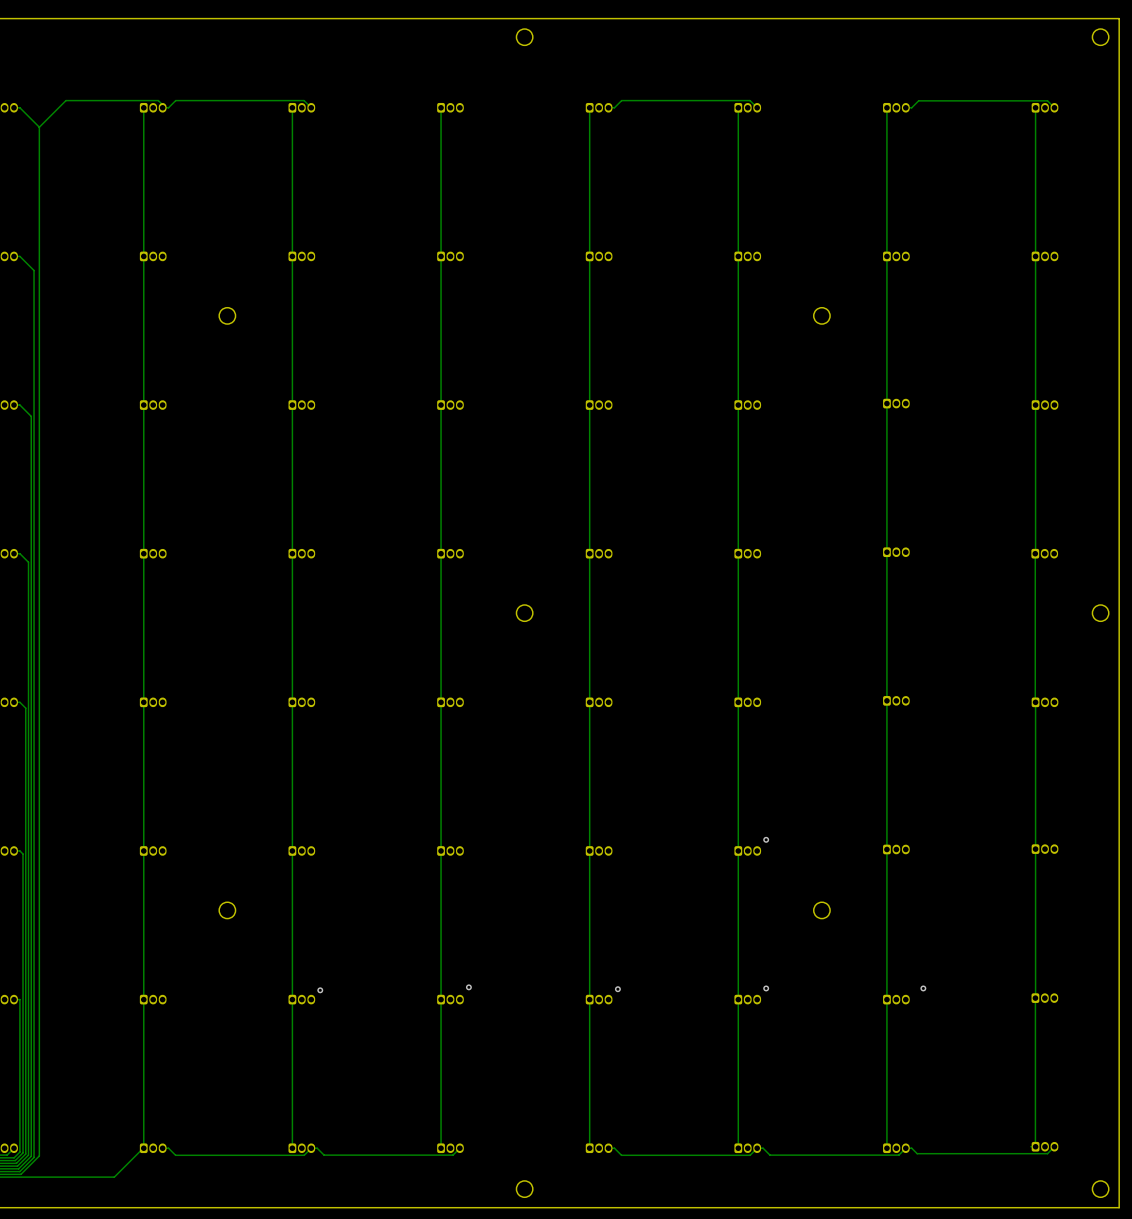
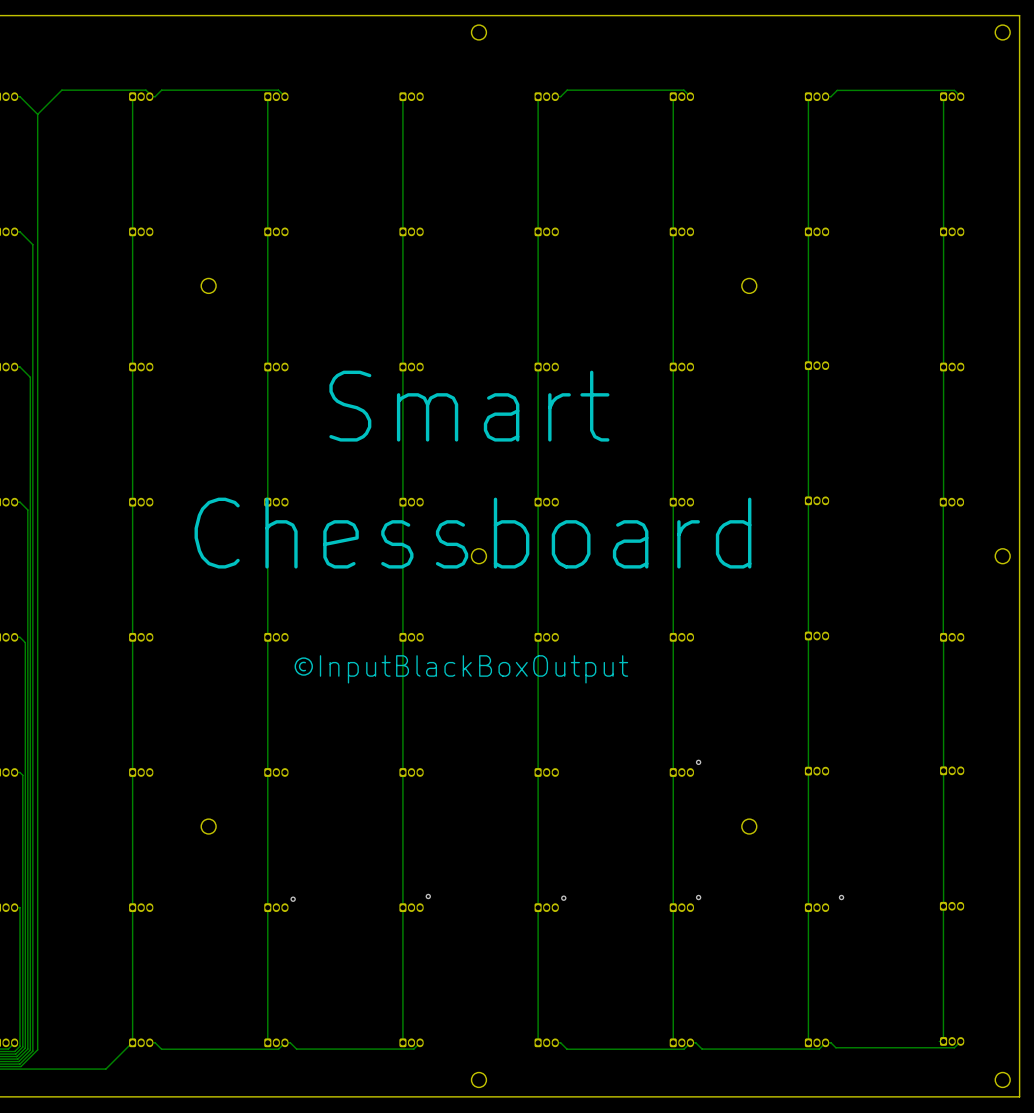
text: none -> Smart (469, 406)
text: none -> Chessboard (472, 533)
drawing: none -> [294, 657, 313, 676]
line: none -> (305, 662) (301, 662) (299, 666) (301, 670) (305, 670)
text: none -> InputBlackBoxOutput (474, 669)

